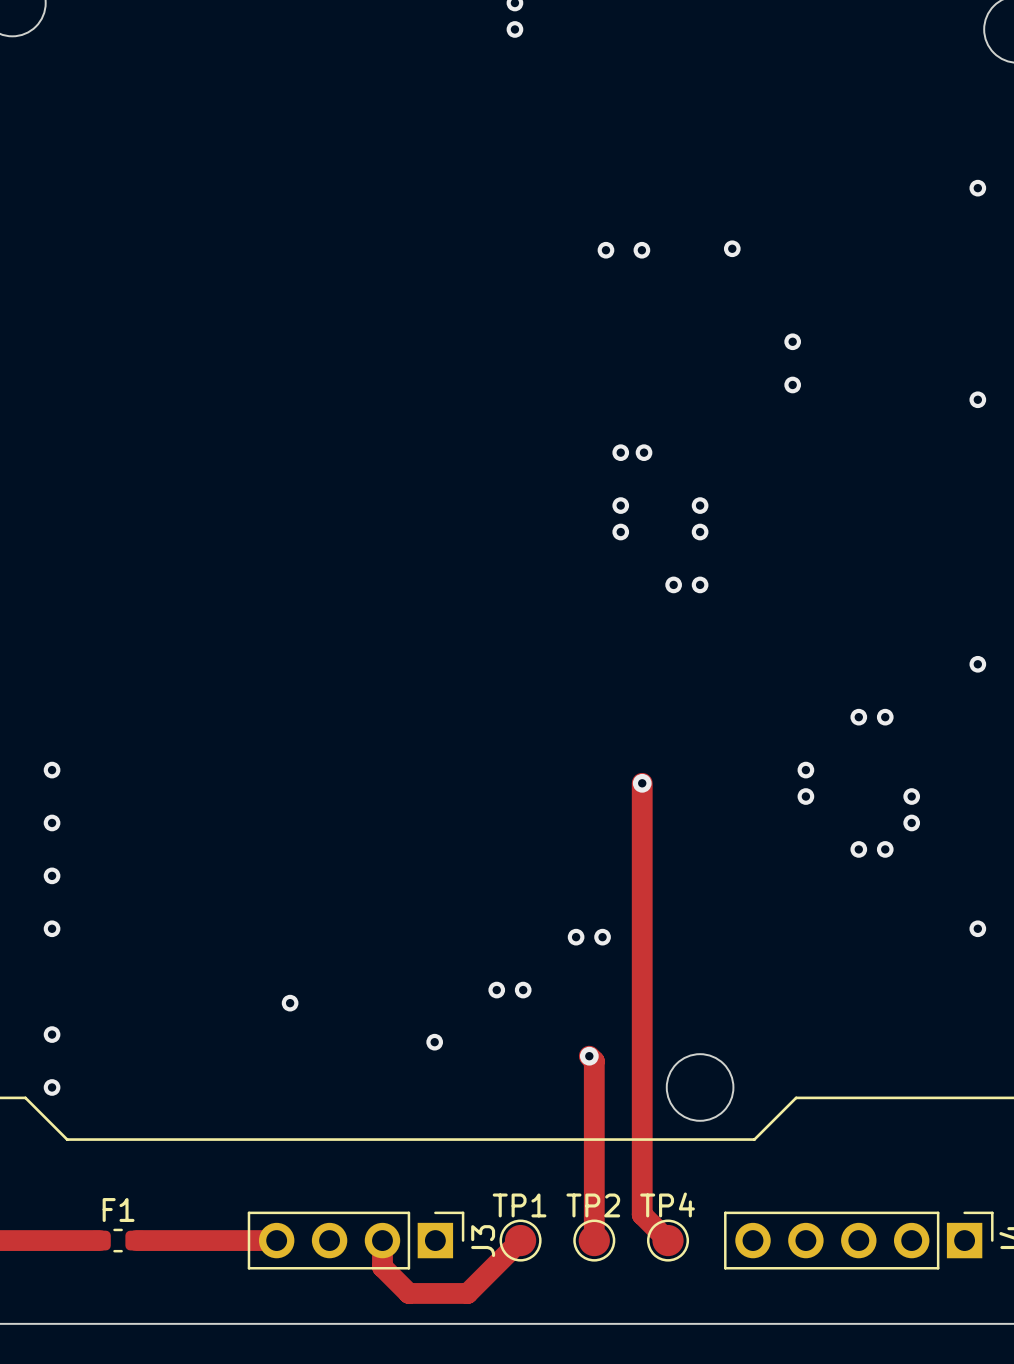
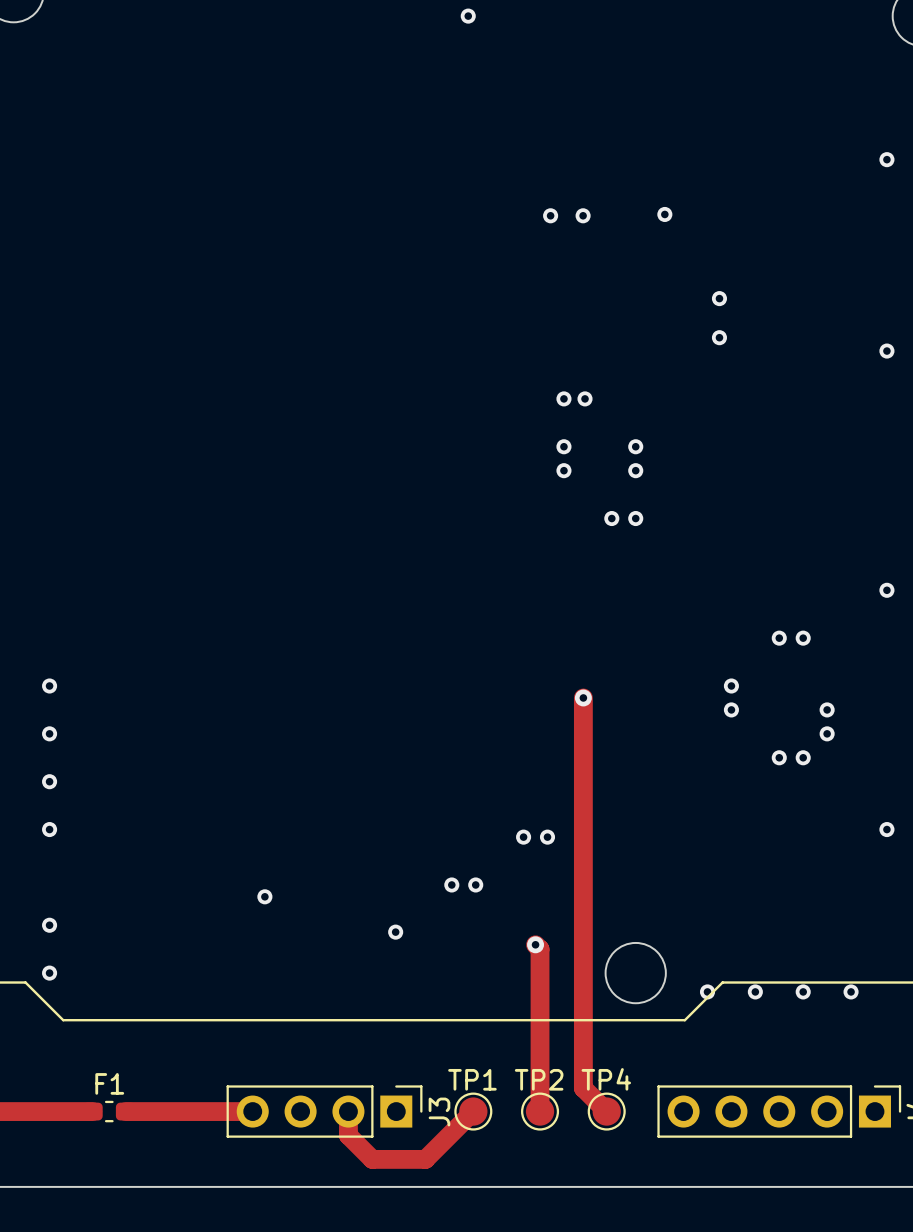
via: none -> (707, 991)
via: none -> (755, 991)
via: none -> (803, 991)
via: none -> (851, 991)

